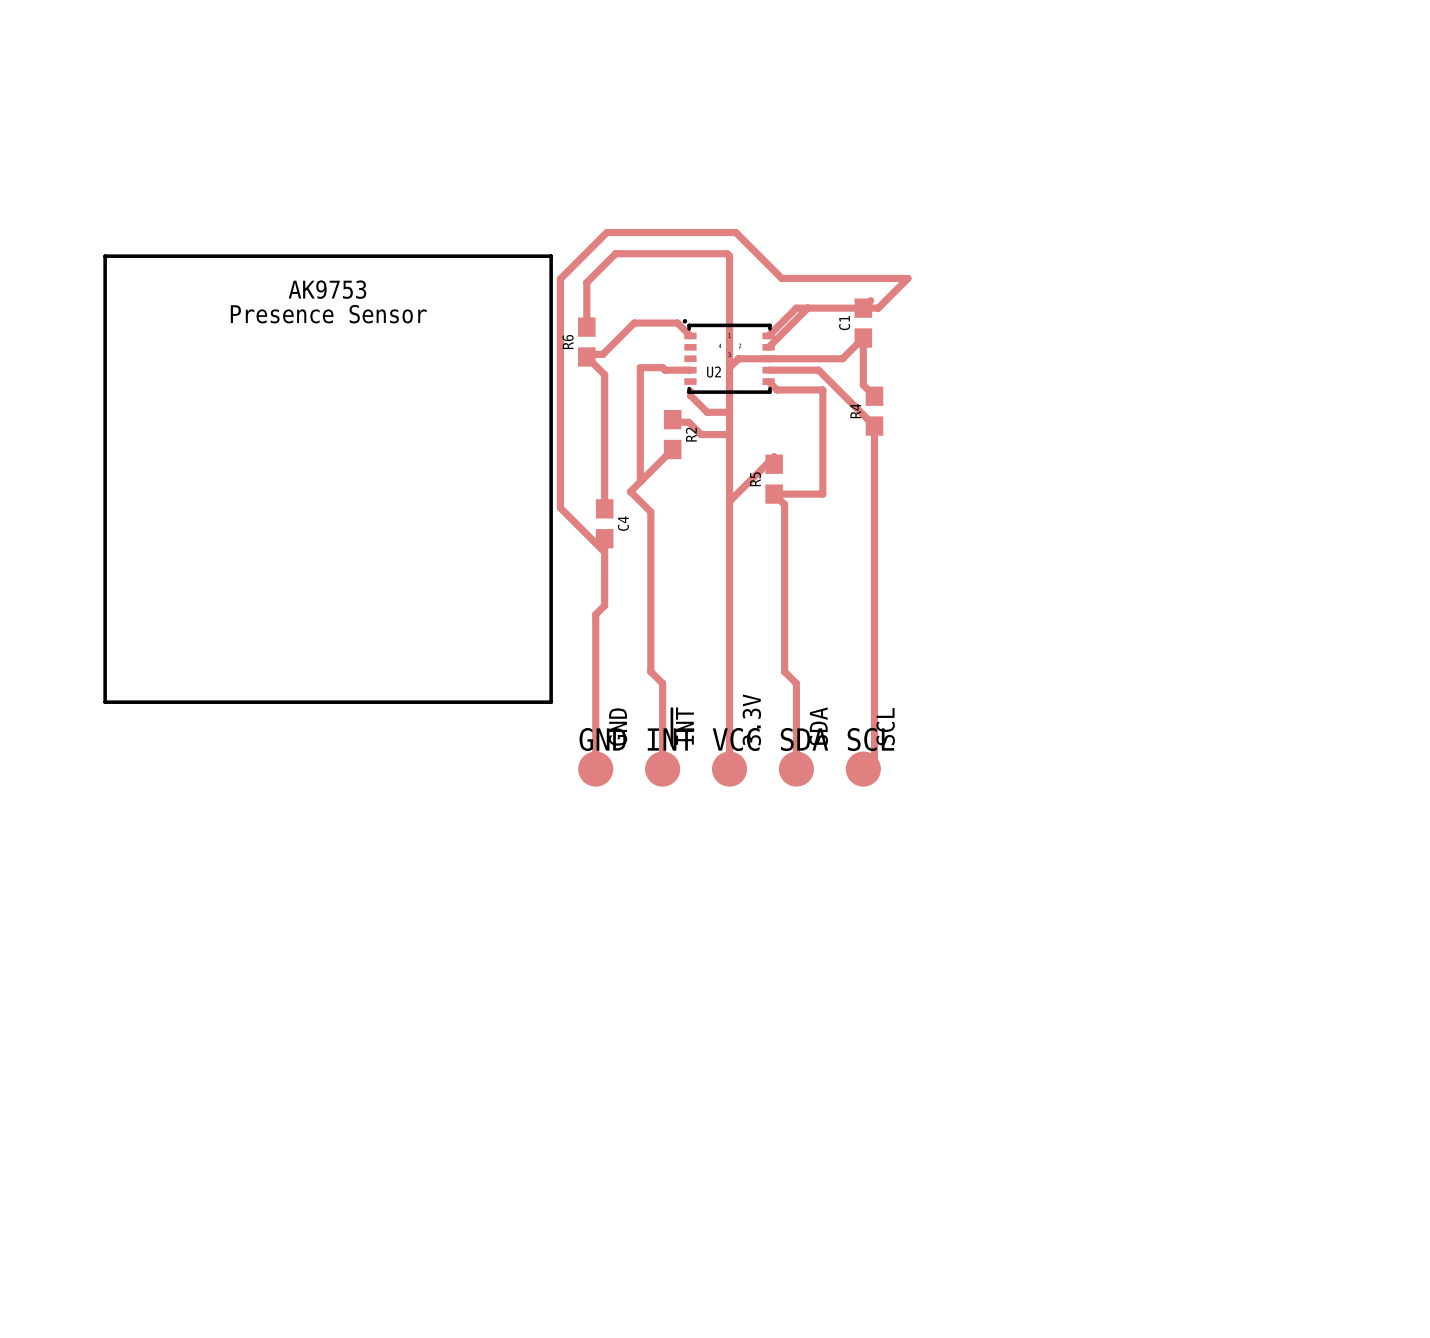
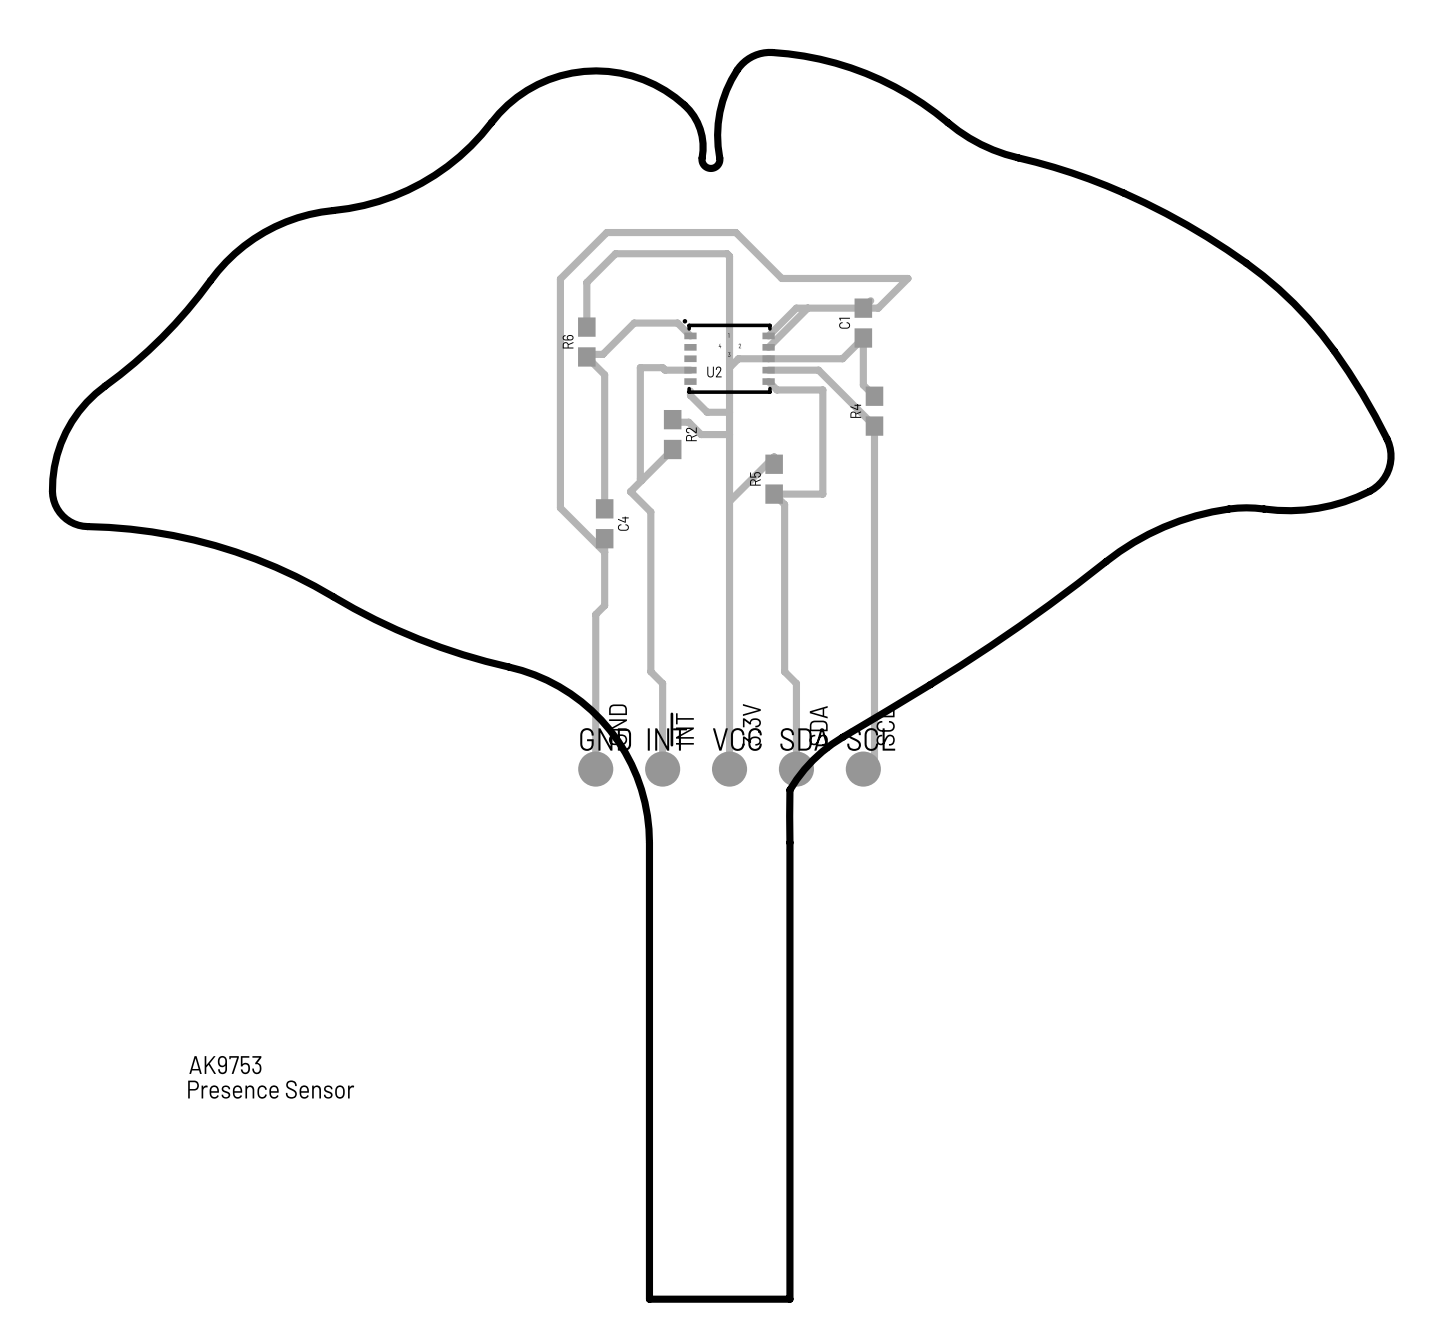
board edge: none -> (772, 52) (760, 53) (748, 58) (739, 66) (731, 79) (719, 112) (717, 135) (719, 160) (714, 167) (707, 167) (702, 162) (702, 136) (693, 116) (684, 105) (665, 90) (643, 79) (620, 73) (596, 70) (572, 73) (548, 79) (517, 97) (499, 113) (459, 156) (421, 183) (378, 201) (309, 214) (286, 221) (264, 232) (244, 245) (226, 262) (187, 310) (148, 350) (86, 402) (71, 421) (60, 443) (52, 479) (52, 496) (55, 504) (62, 516) (74, 523) (173, 535) (215, 545) (255, 559) (295, 576) (375, 619) (418, 638) (463, 654) (522, 670) (547, 680) (581, 701) (601, 720) (618, 741) (631, 764) (641, 789) (648, 829) (649, 1299) (789, 1299) (789, 789) (804, 769) (832, 744) (990, 646) (1049, 605) (1119, 551) (1148, 534) (1195, 515) (1228, 509) (1304, 510) (1344, 501) (1369, 491) (1377, 485) (1387, 473) (1390, 458) (1388, 443) (1375, 416) (1348, 372) (1321, 334) (1278, 289) (1227, 249) (1166, 213) (1123, 192) (1071, 172) (1005, 154) (981, 144) (958, 130) (922, 103) (880, 79) (835, 63) (804, 56) (772, 52)
board edge: (105, 256) (105, 702) (551, 702) (551, 256) (105, 256) -> none
text: AK9753 (327, 289) -> none
text: Presence Sensor (328, 314) -> none
text: none -> AK9753 (225, 1065)
text: none -> Presence Sensor (271, 1089)

